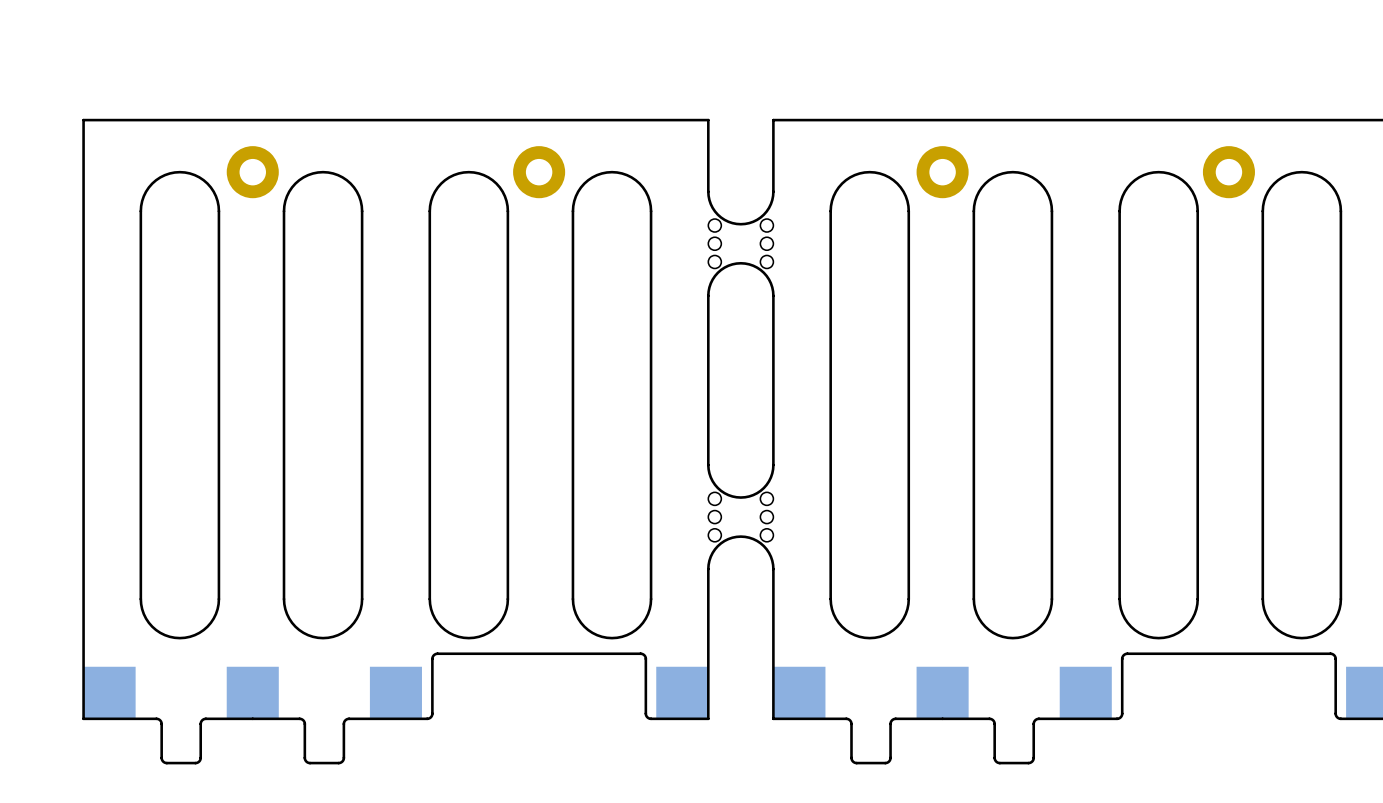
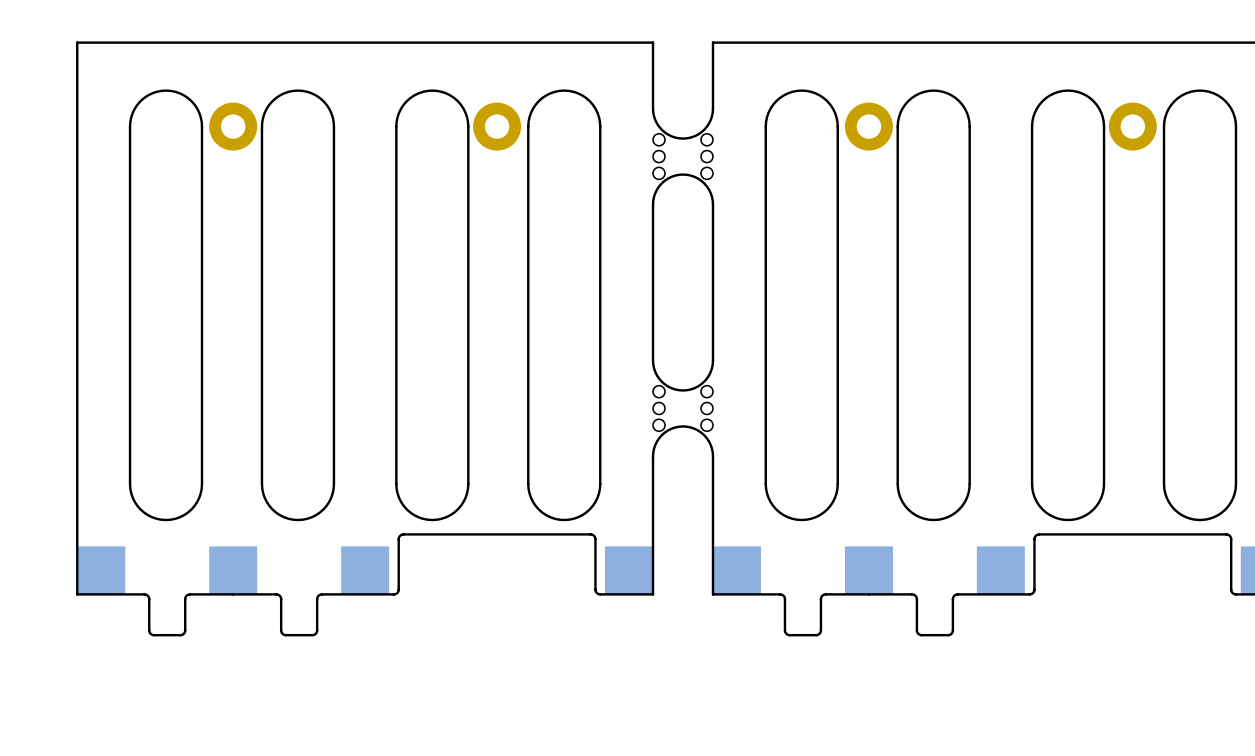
part position: (252, 172) -> (233, 126)
part position: (539, 172) -> (497, 126)
part position: (942, 172) -> (868, 126)
part position: (1228, 172) -> (1132, 126)

